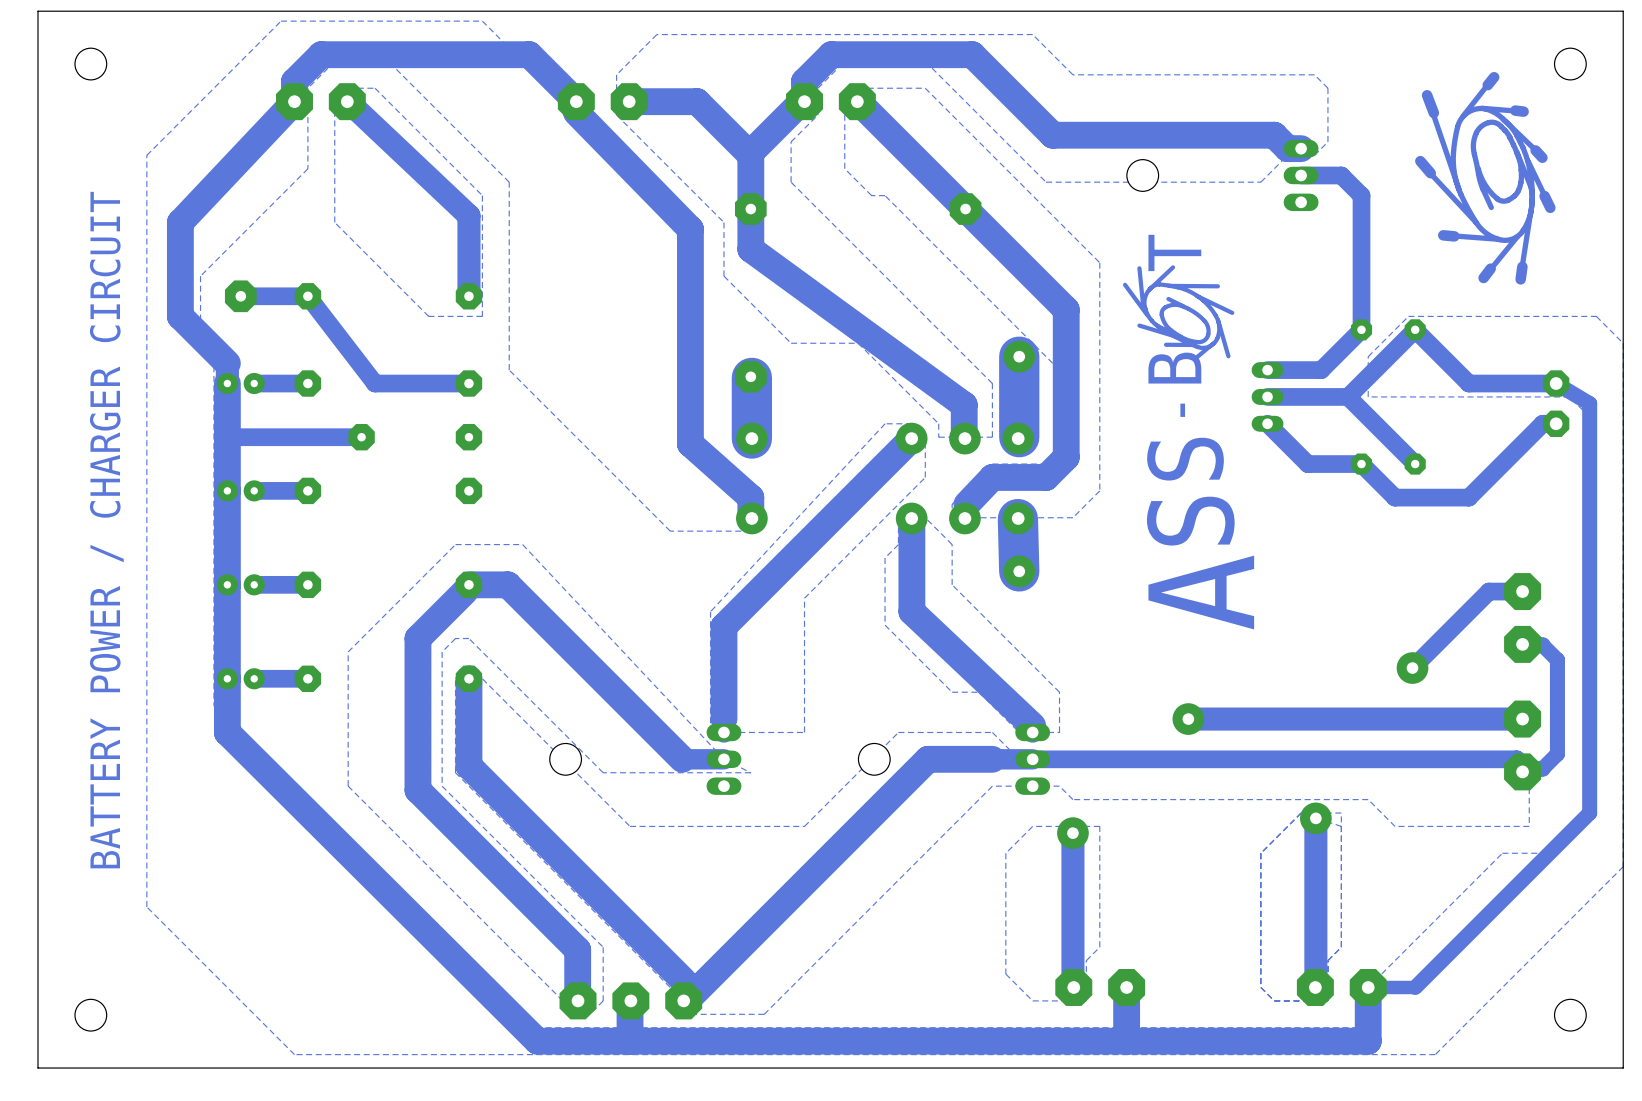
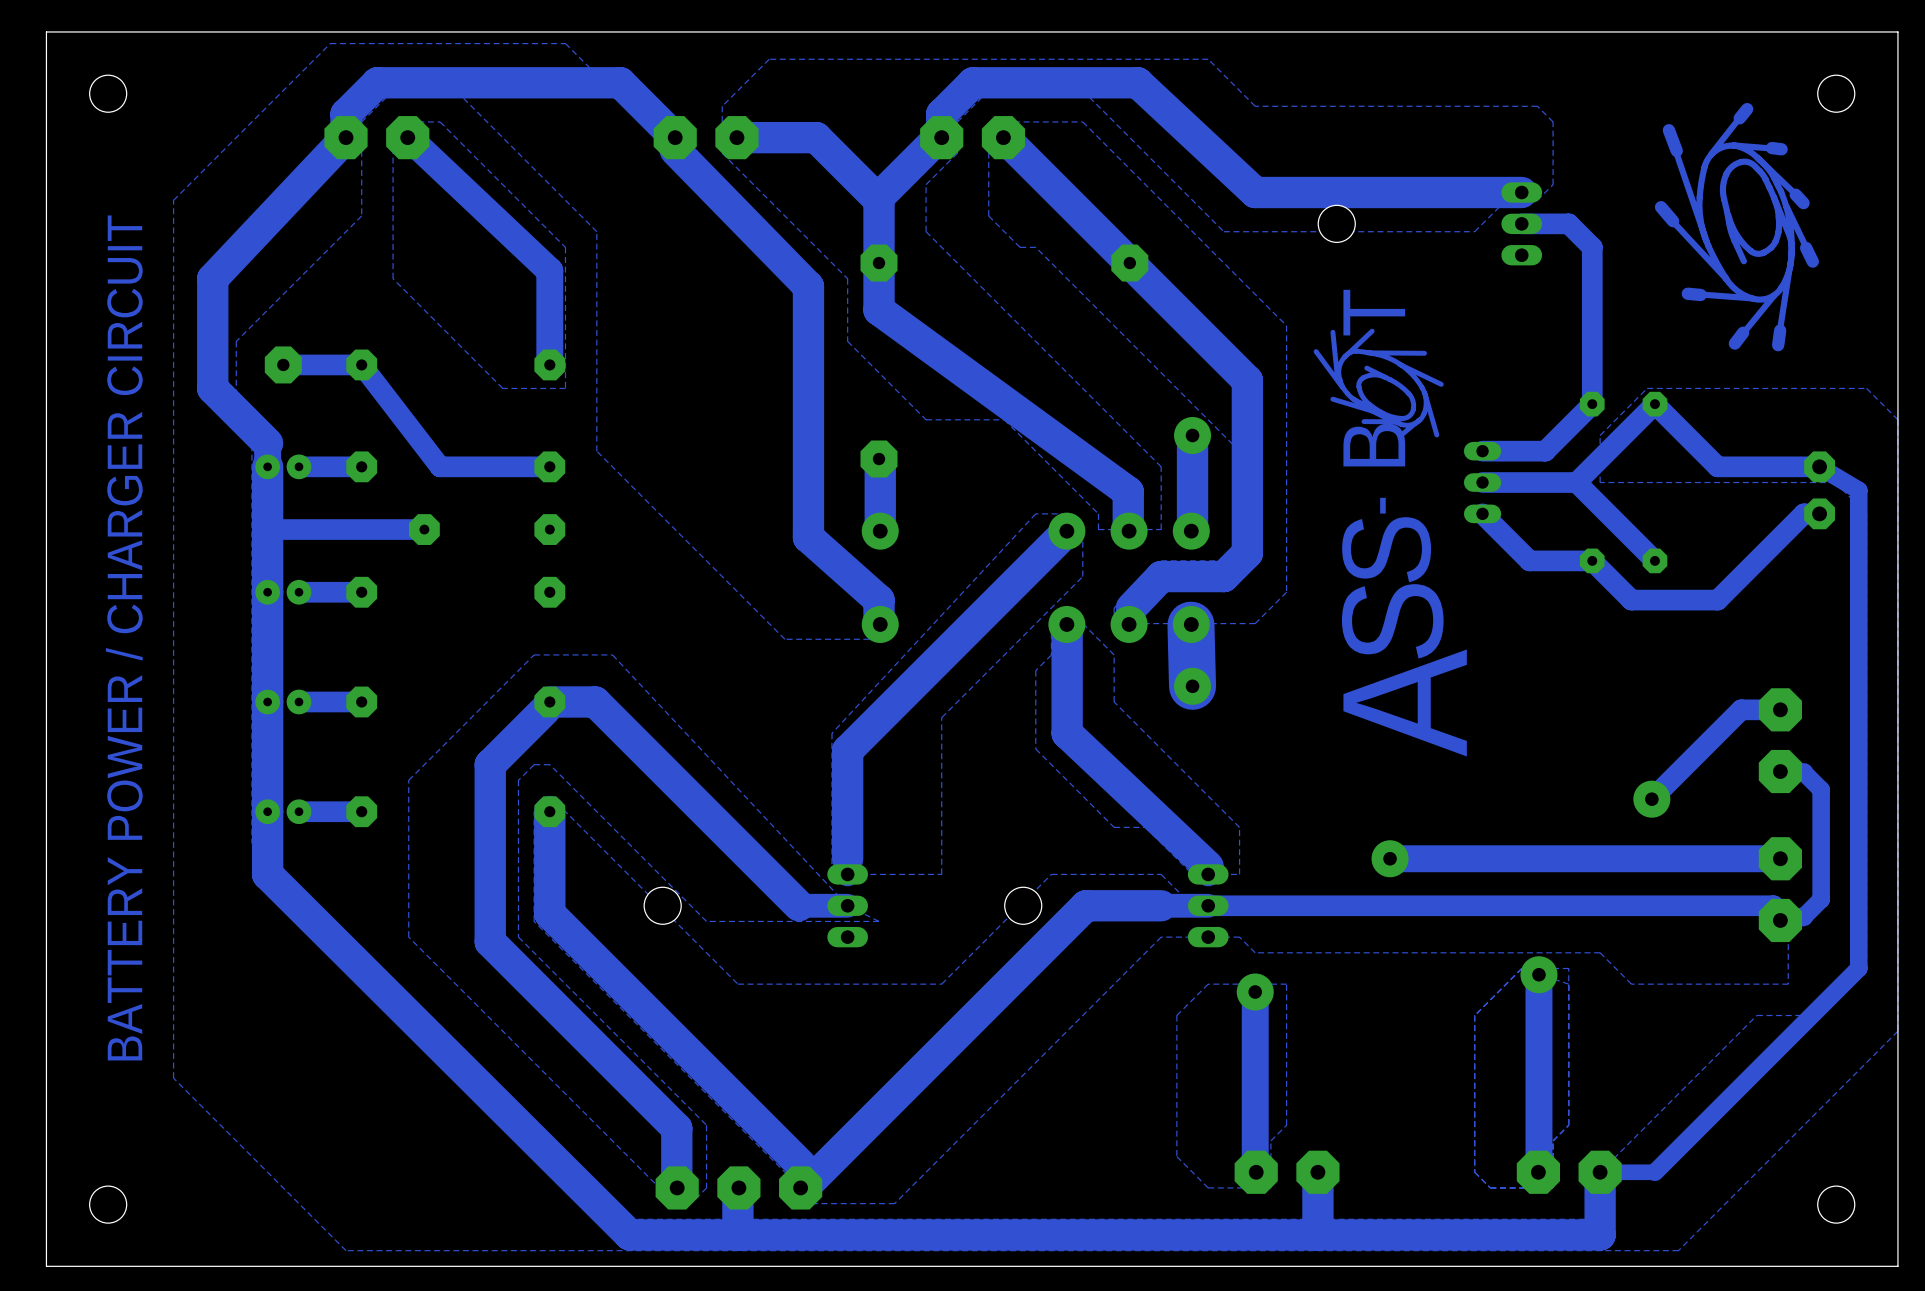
track: (972, 54) (1052, 135) (1274, 135) (1287, 148) -> (1137, 82) (1255, 192) (1506, 192)
track width: thick (1019, 356) (1019, 437) -> thin (1192, 435) (1192, 529)
track width: thick (751, 377) (751, 438) -> thin (880, 460) (880, 531)

